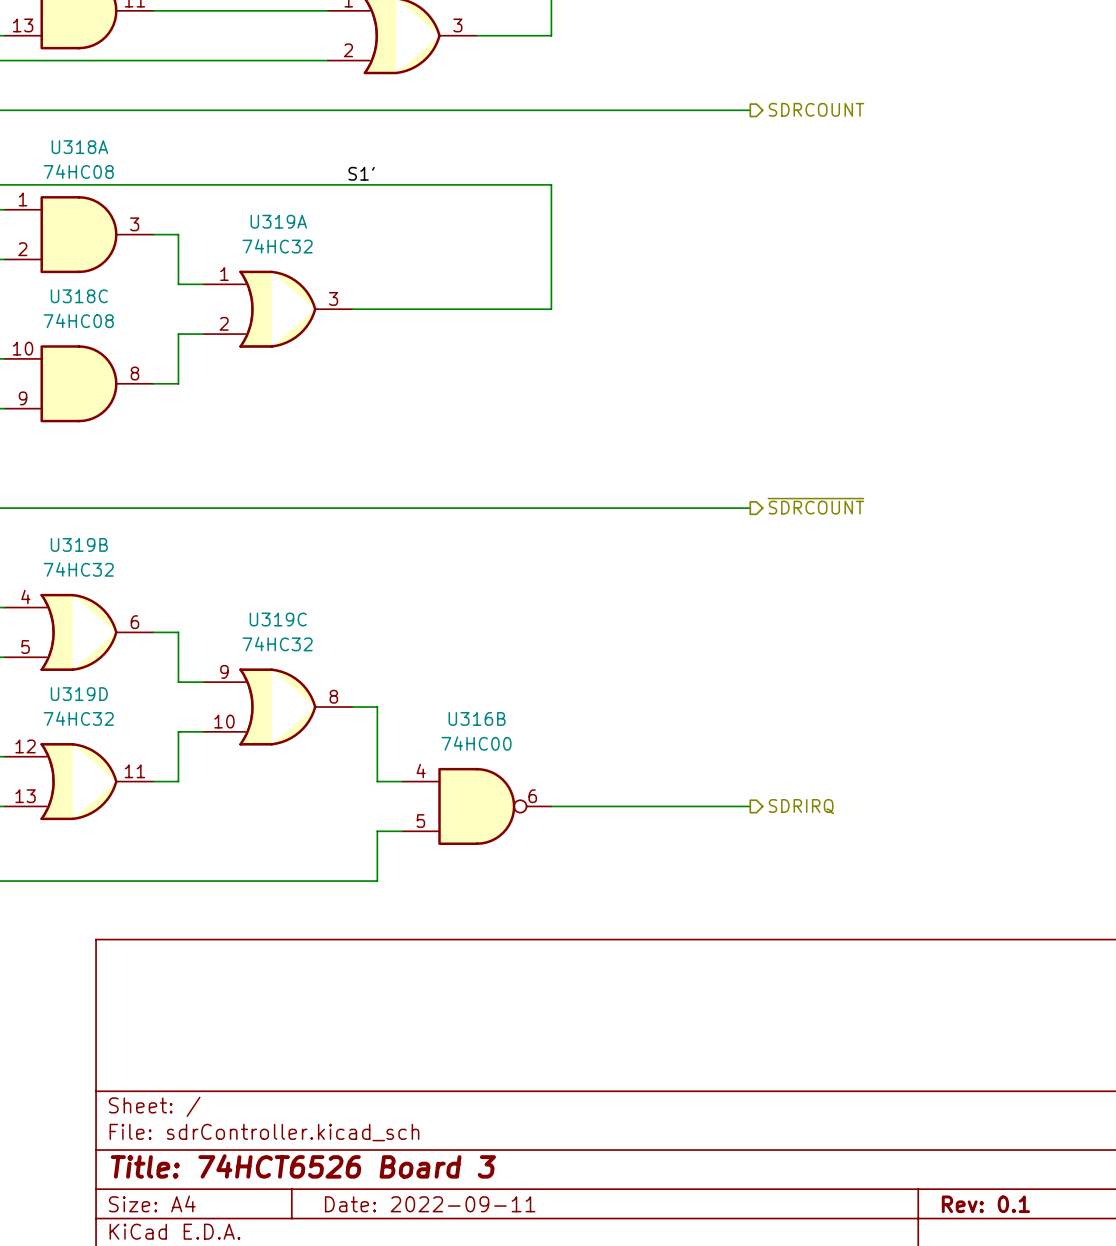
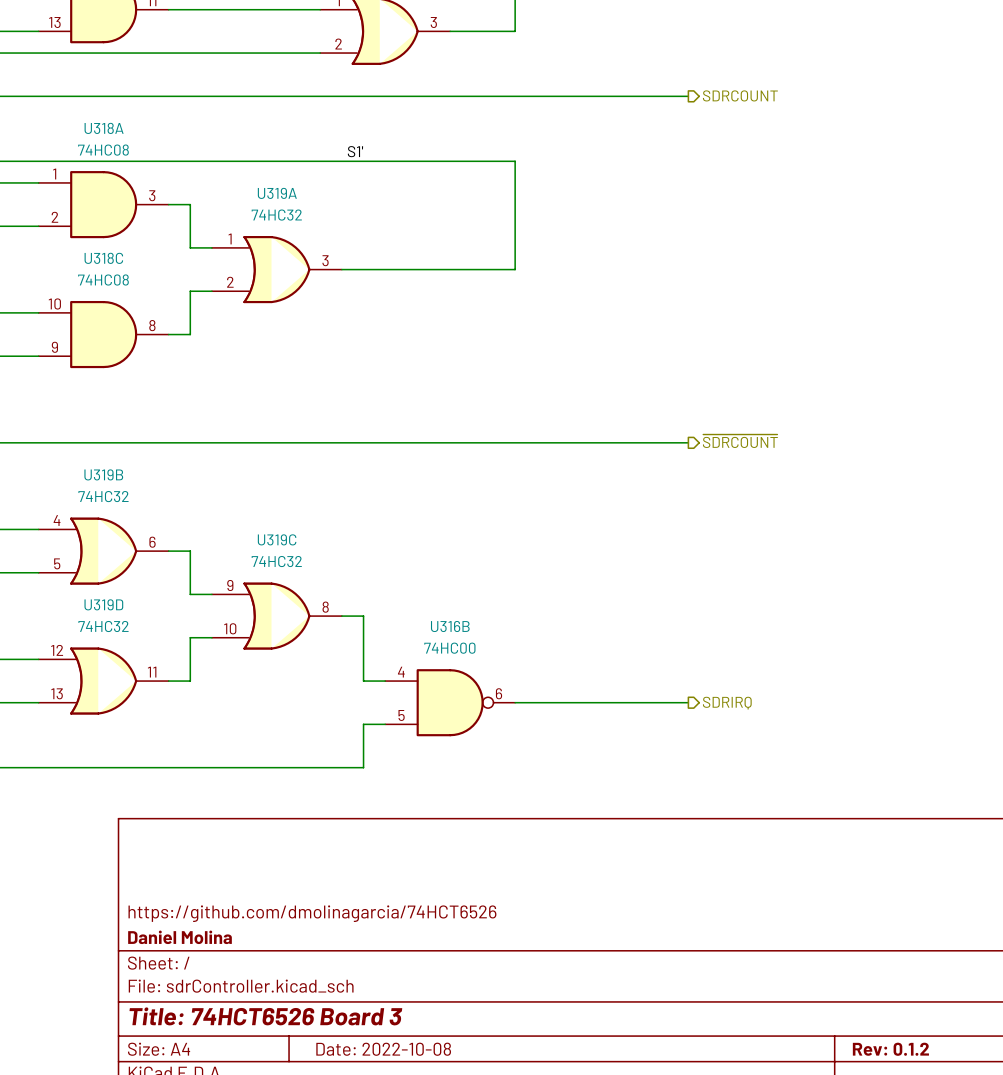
title block: none -> https://github.com/dmolinagarcia/74HCT6526 (312, 913)
title block: none -> Daniel Molina (180, 937)
title block: Date: 2022-09-11 (430, 1204) -> Date: 2022-10-08 (383, 1049)
title block: Rev: 0.1 (985, 1204) -> Rev: 0.1.2 (890, 1049)

